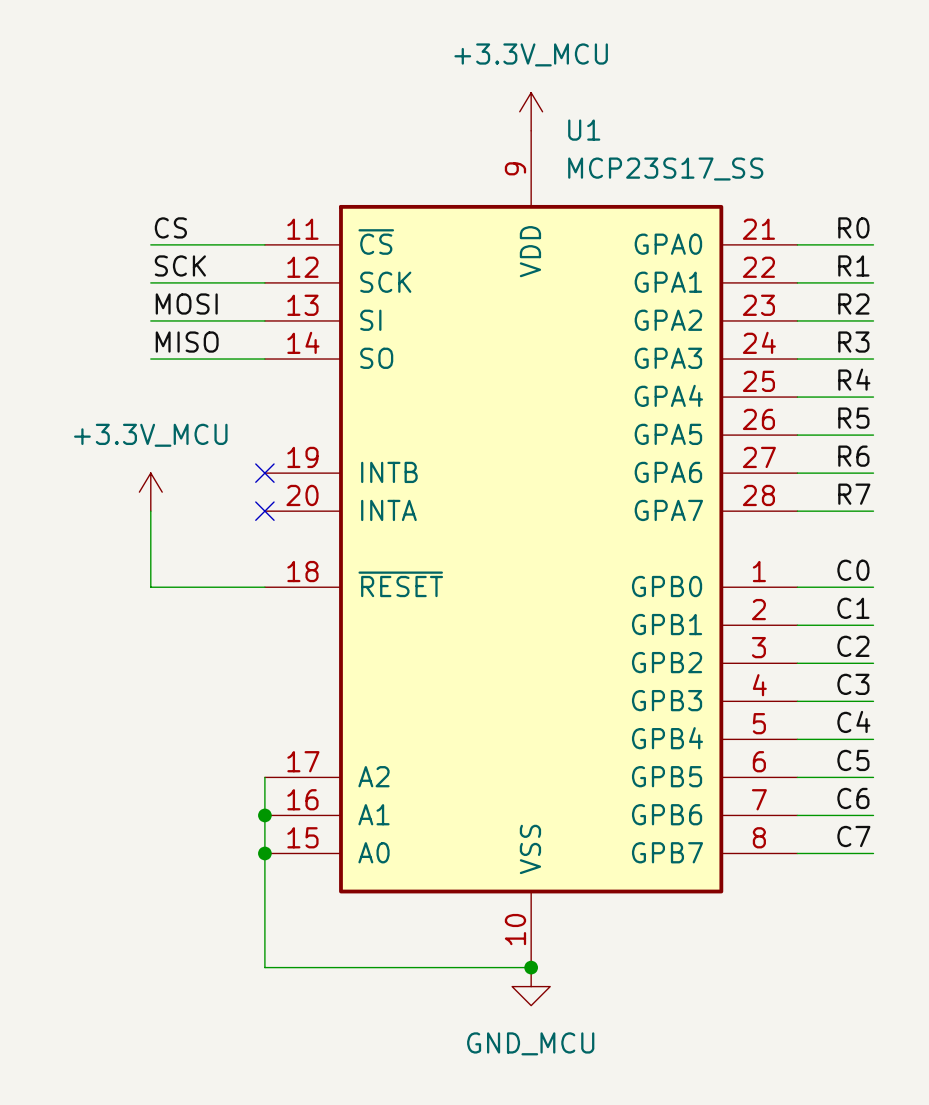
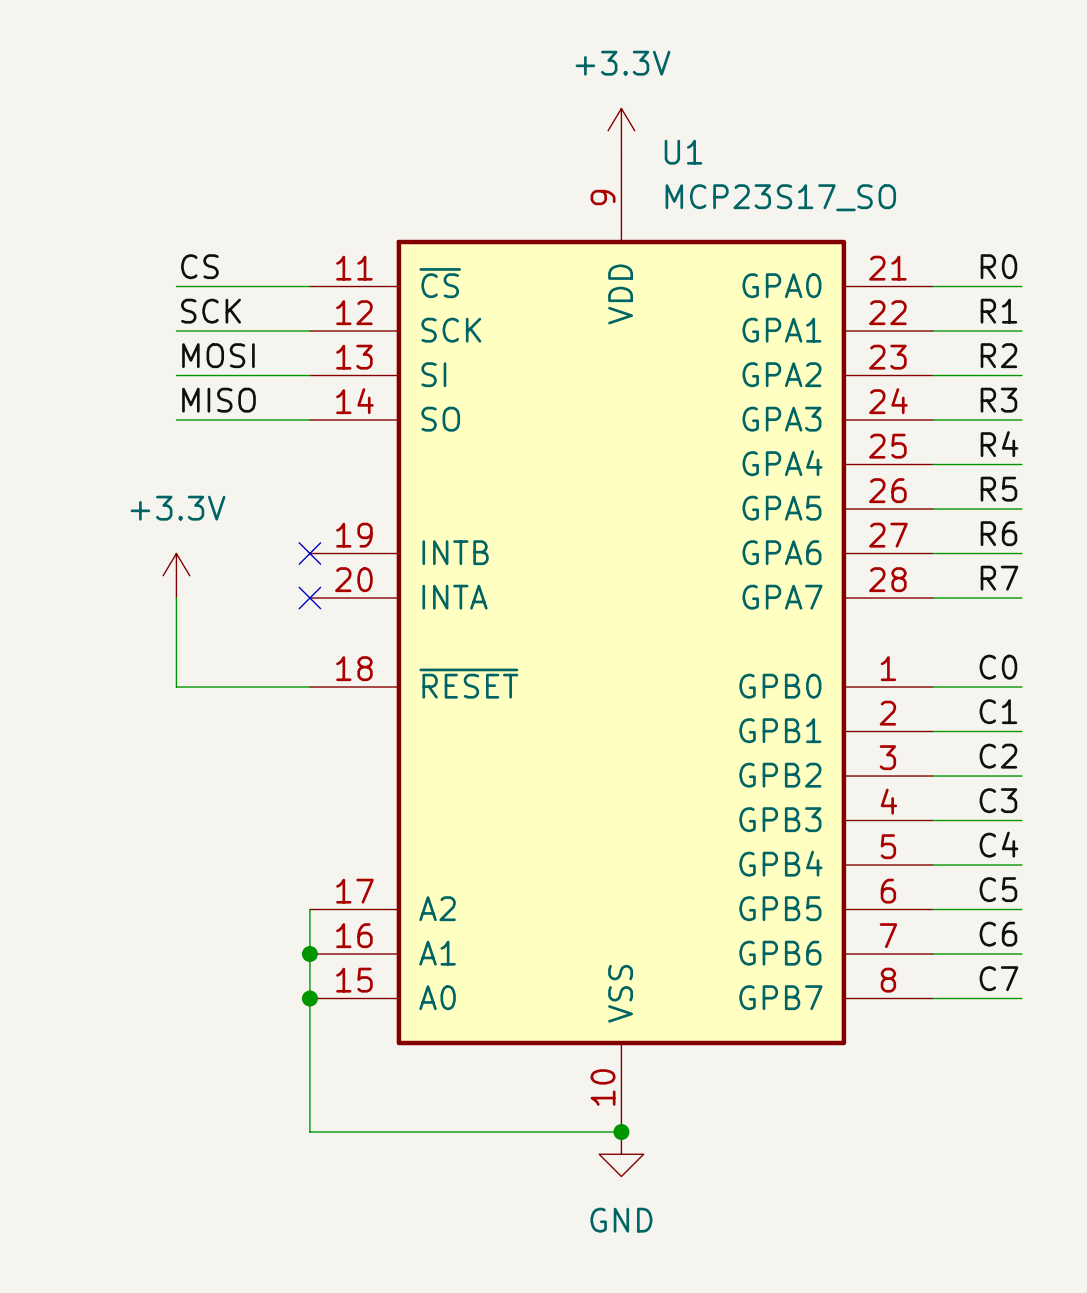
power symbol: +3.3V_MCU (531, 111) -> +3.3V (621, 130)
U1 value: MCP23S17_SS (665, 169) -> MCP23S17_SO (780, 197)
power symbol: +3.3V_MCU (150, 492) -> +3.3V (176, 575)
power symbol: GND_MCU (531, 986) -> GND (621, 1154)

